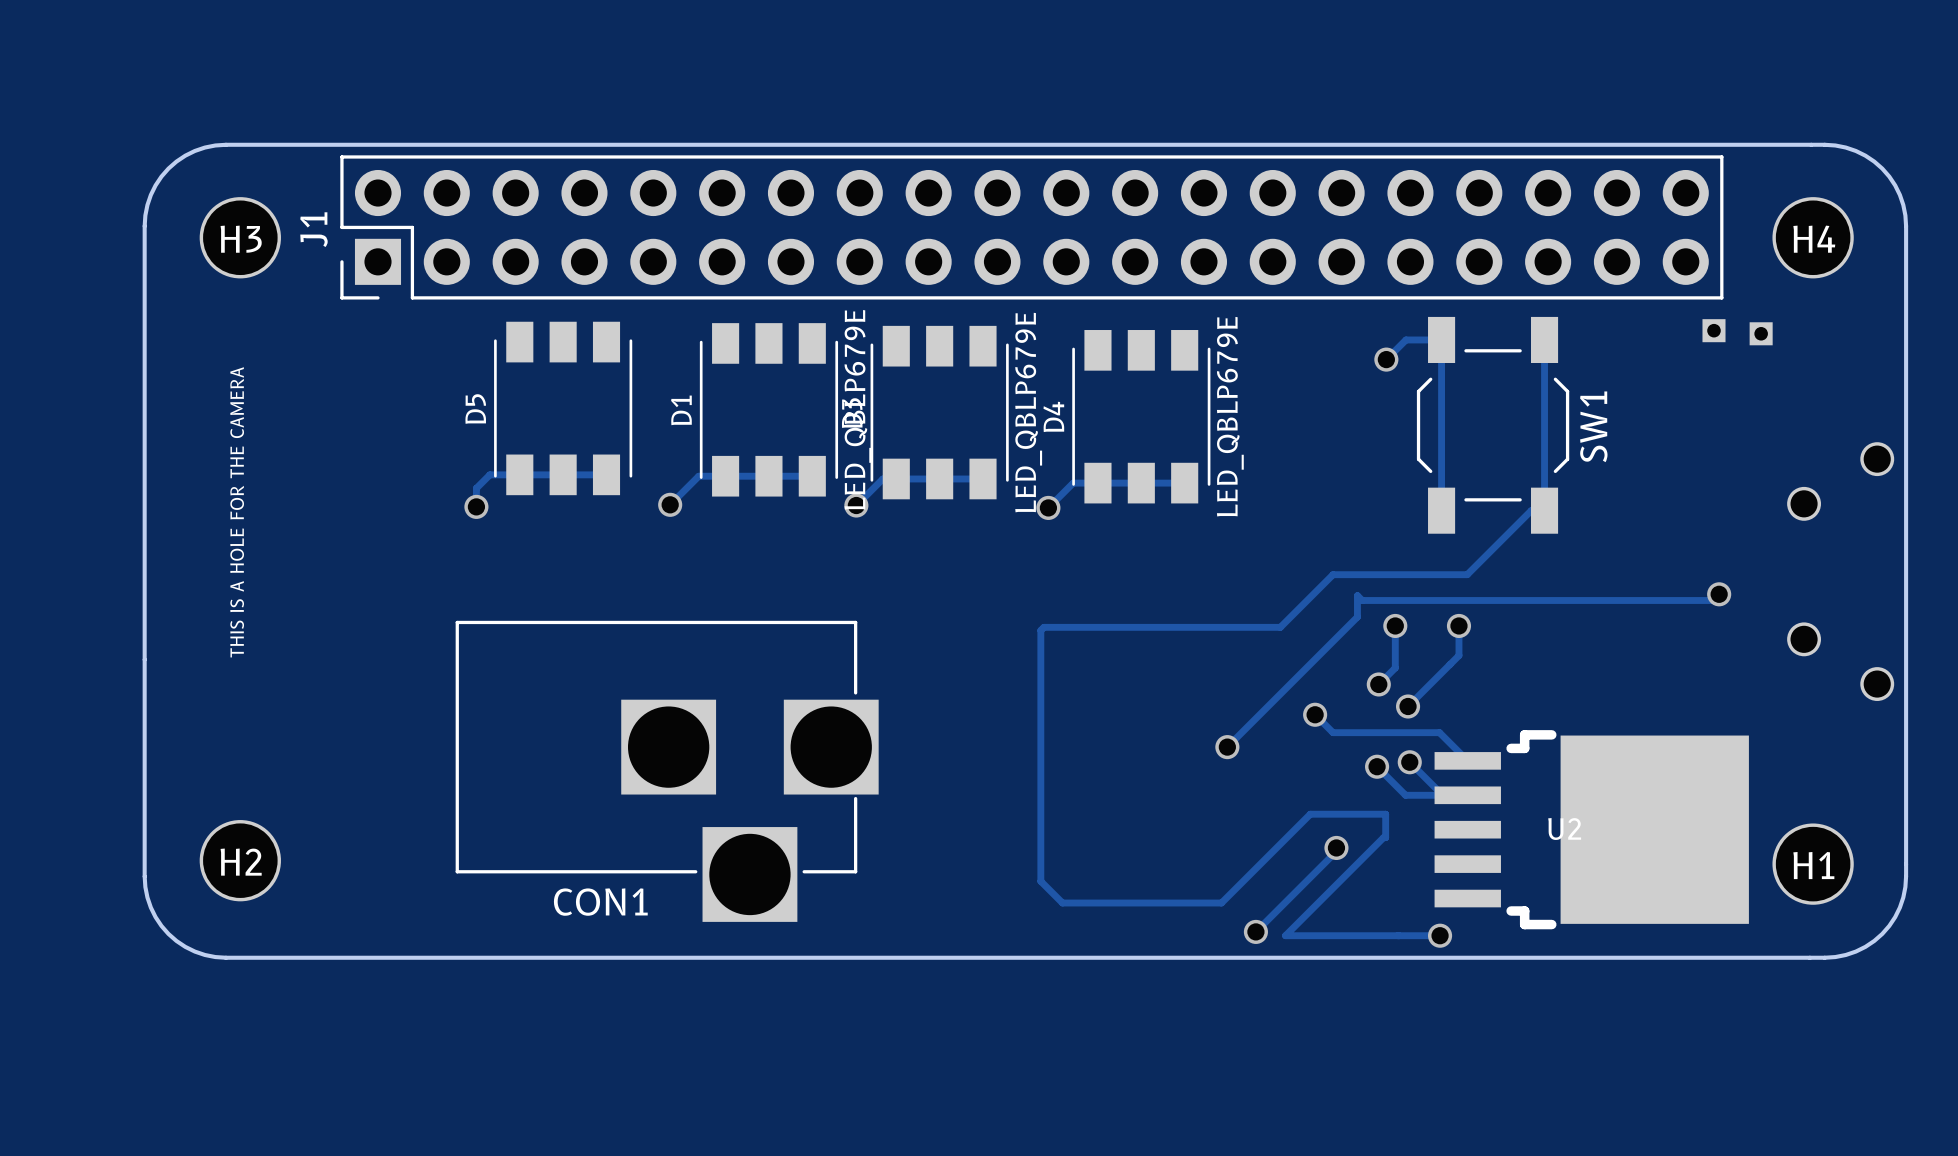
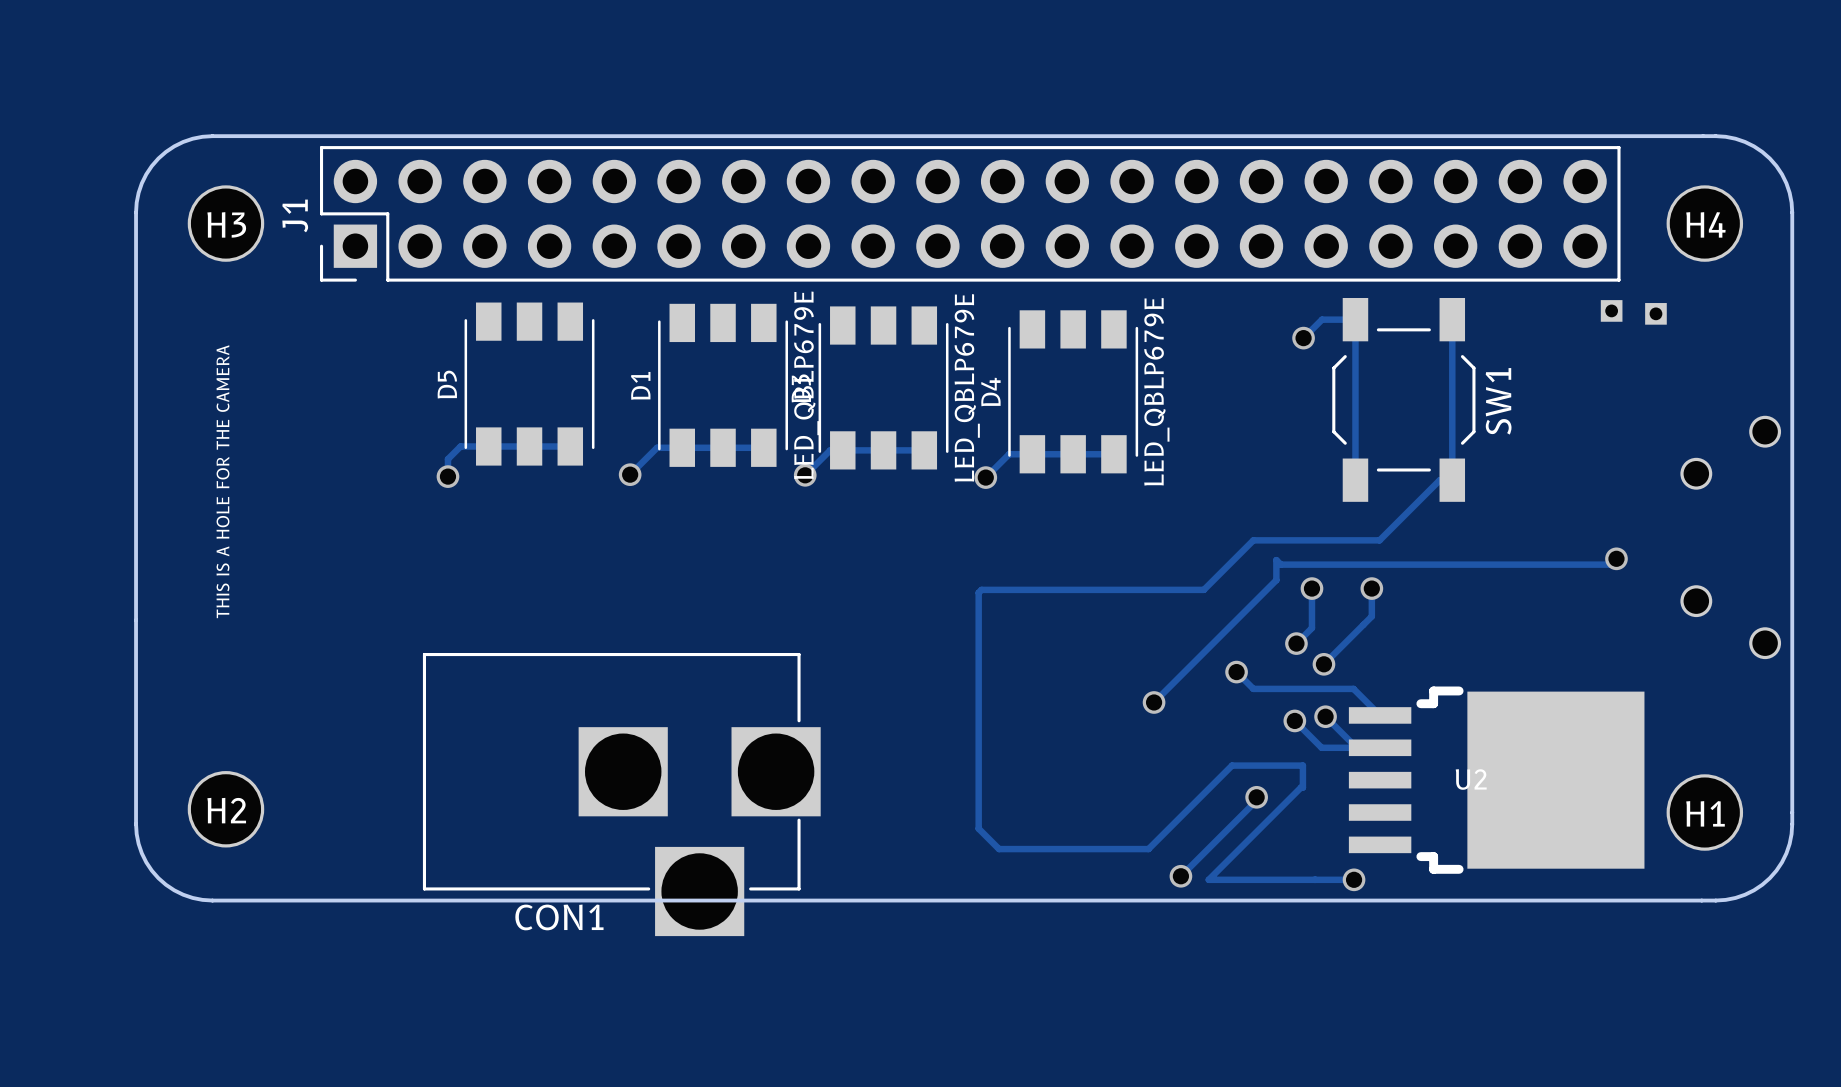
CON1 position: (667, 771) -> (621, 794)

